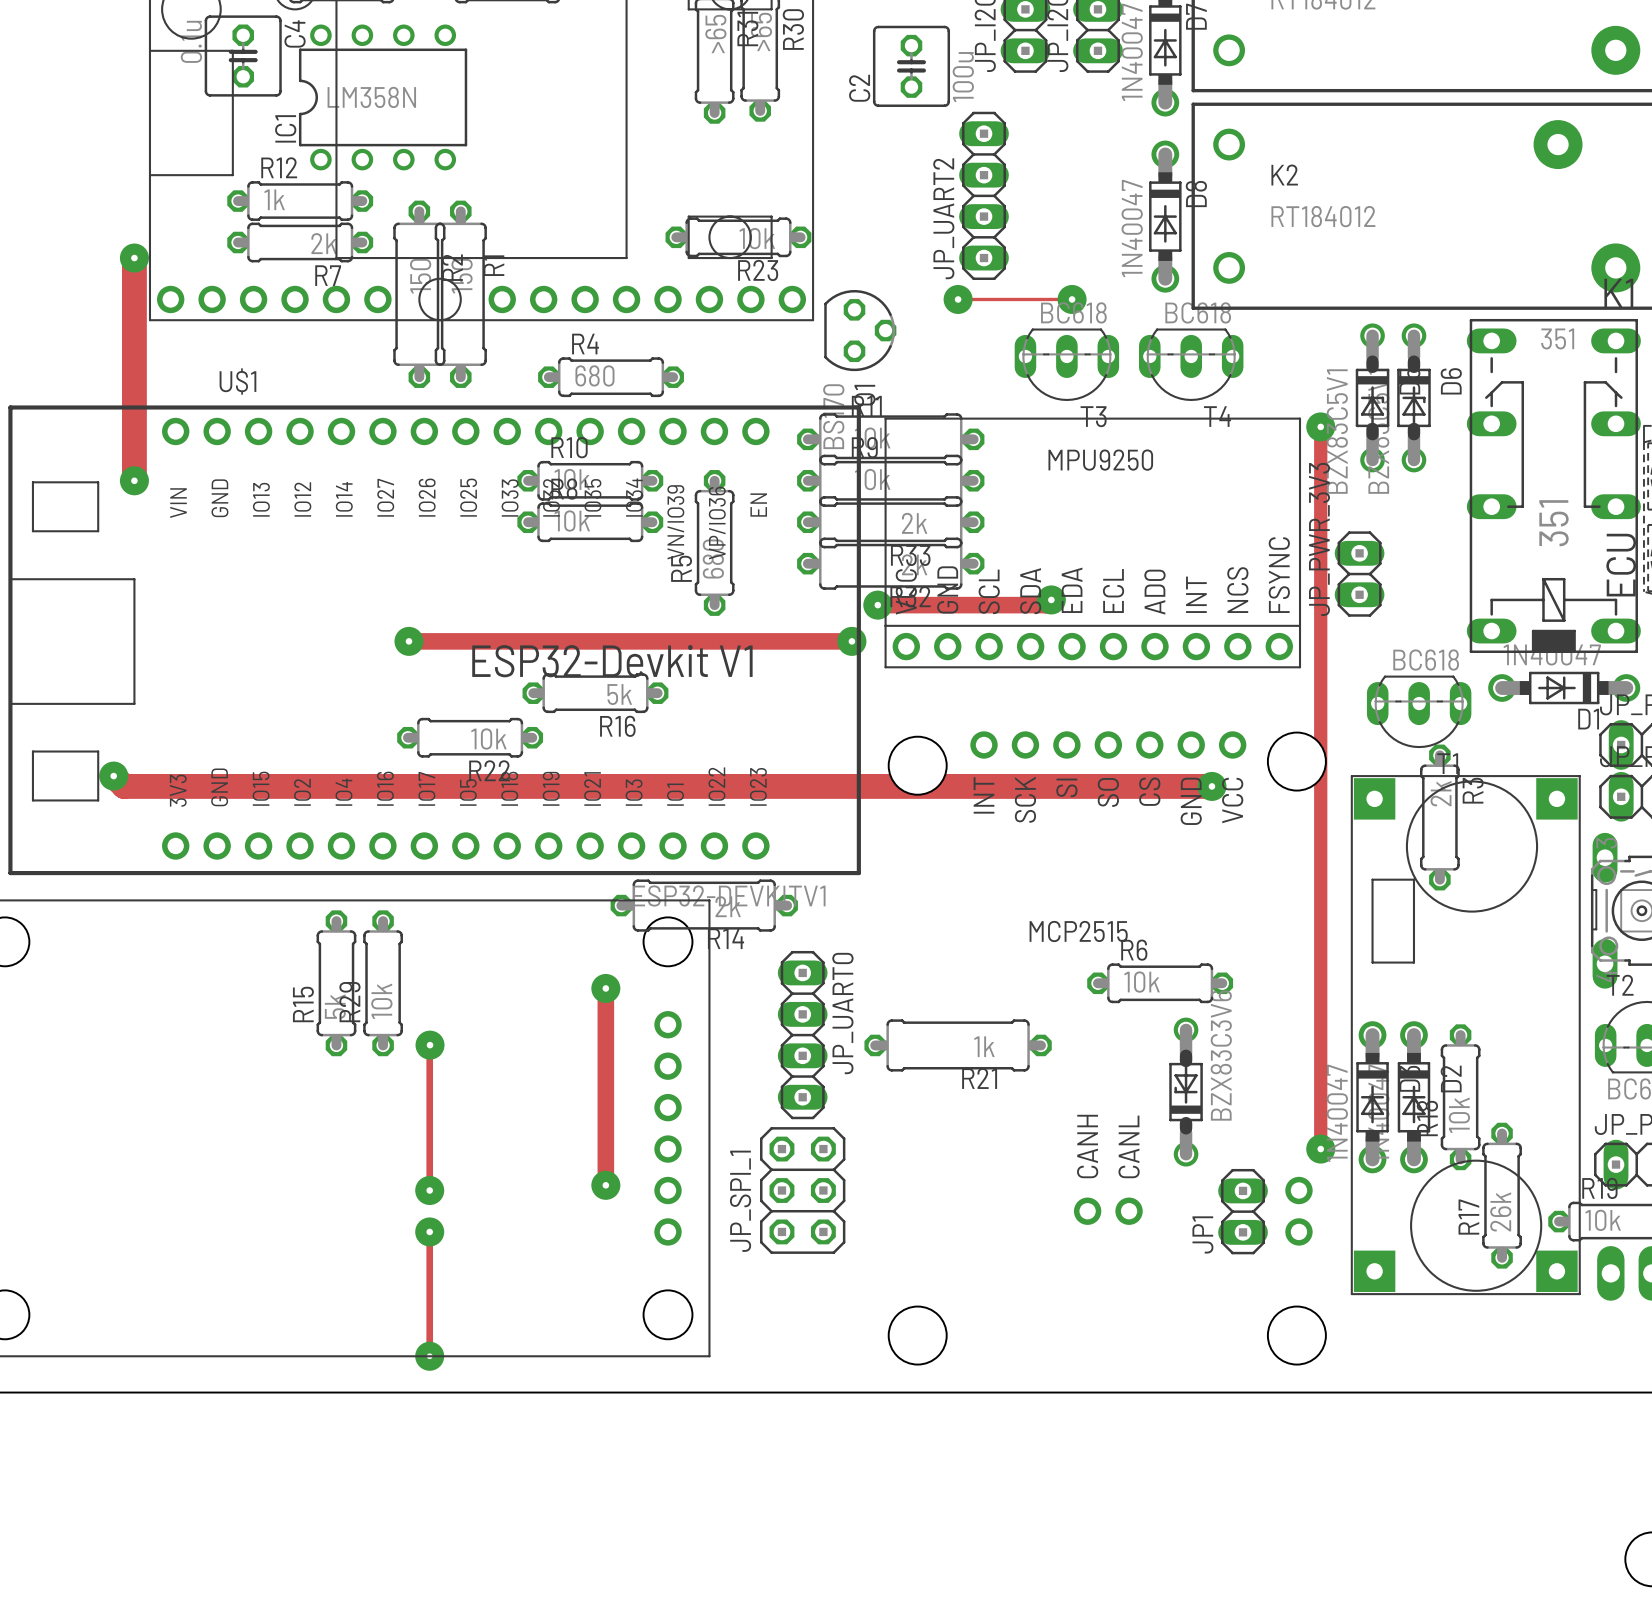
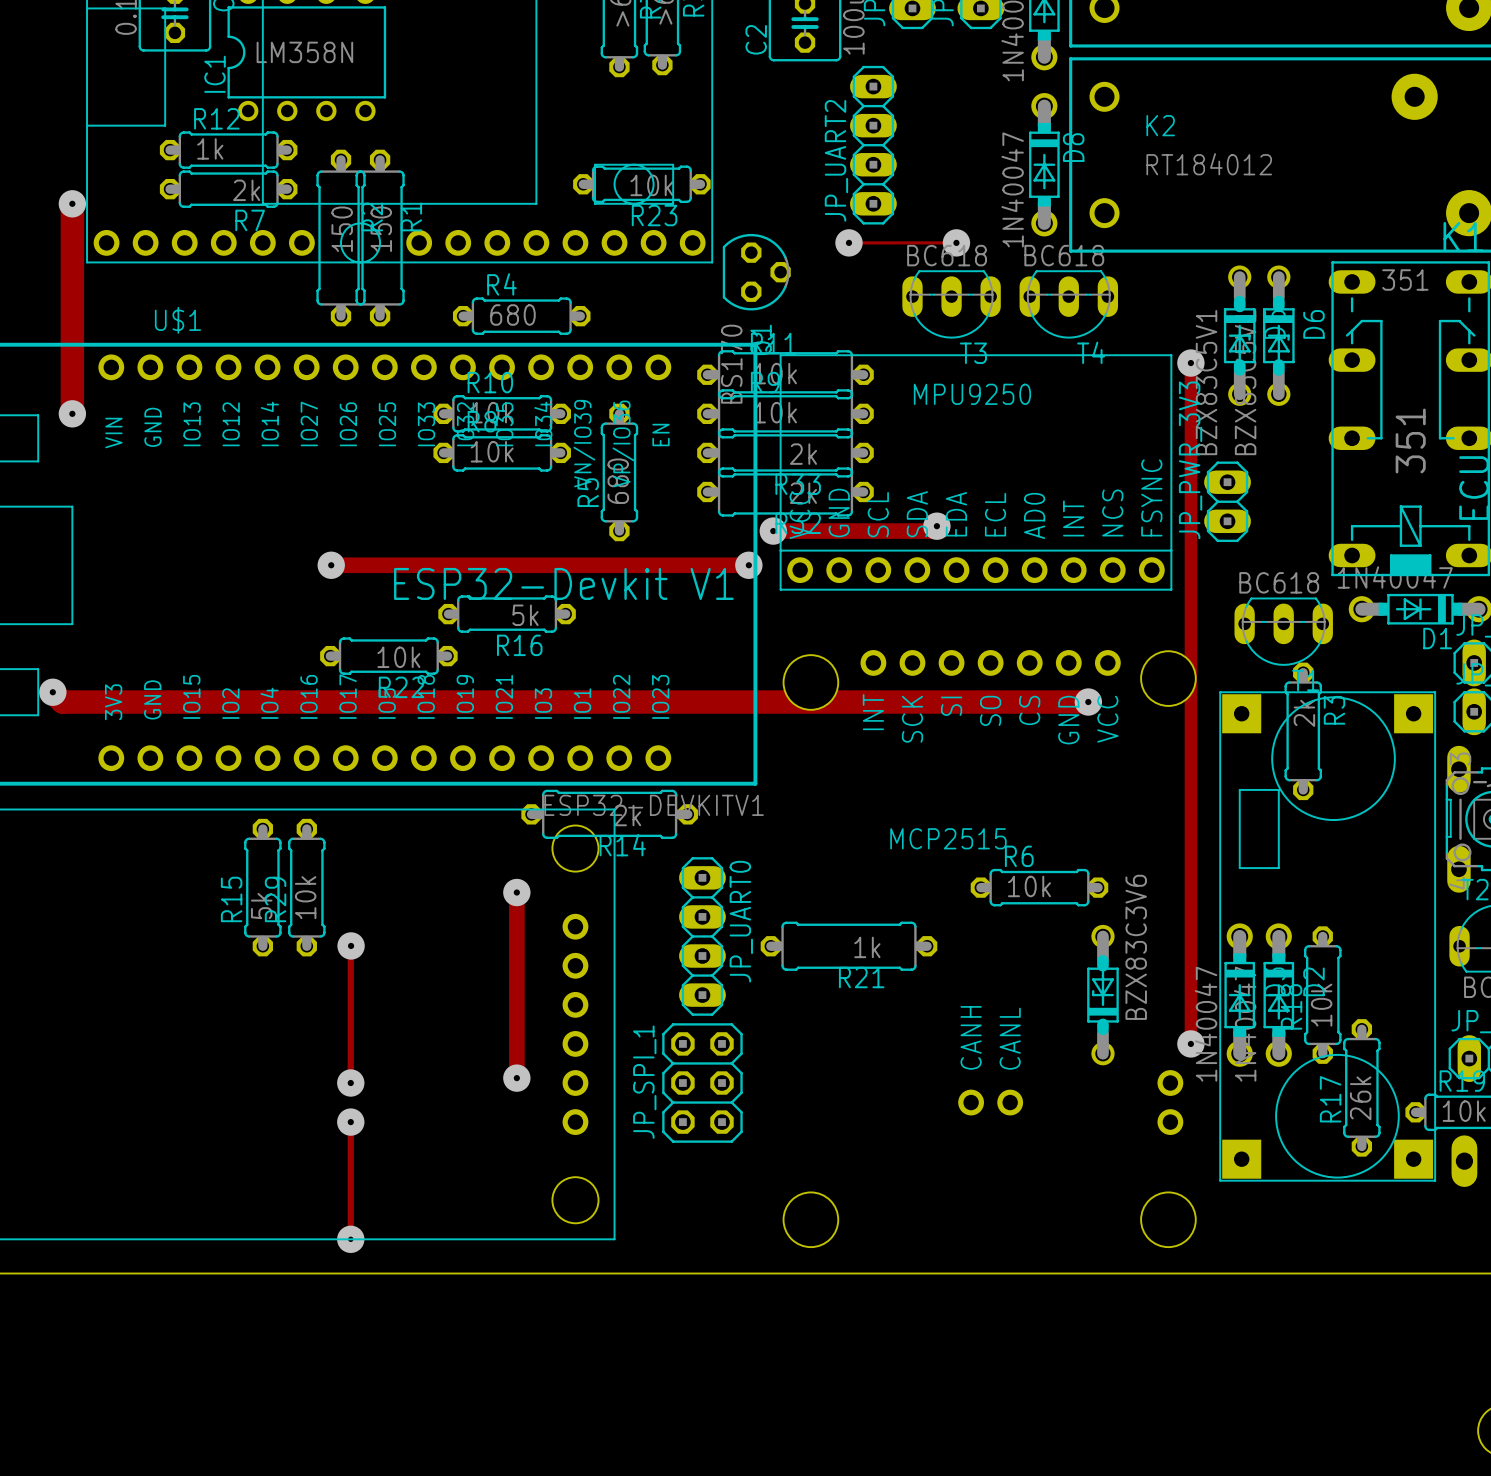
part position: (1186, 1092) -> (1102, 995)
JP1: (1243, 1211) -> none

